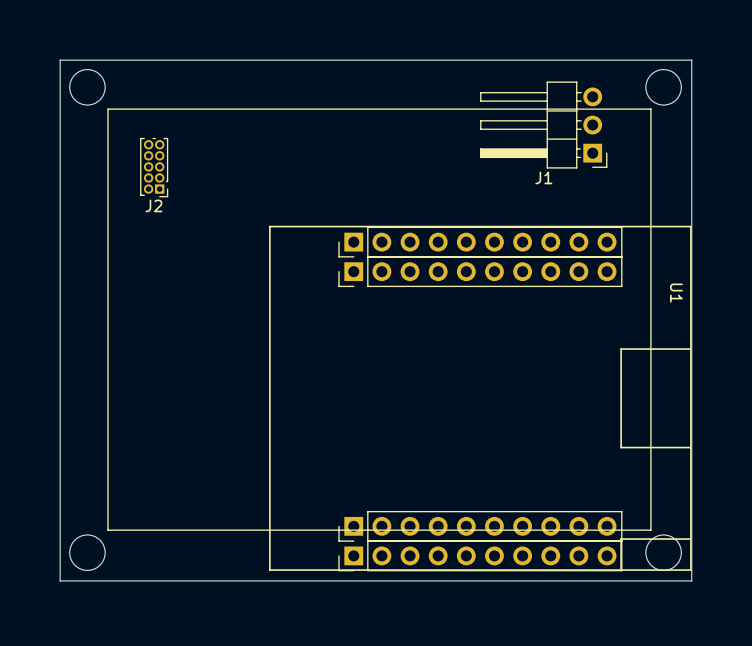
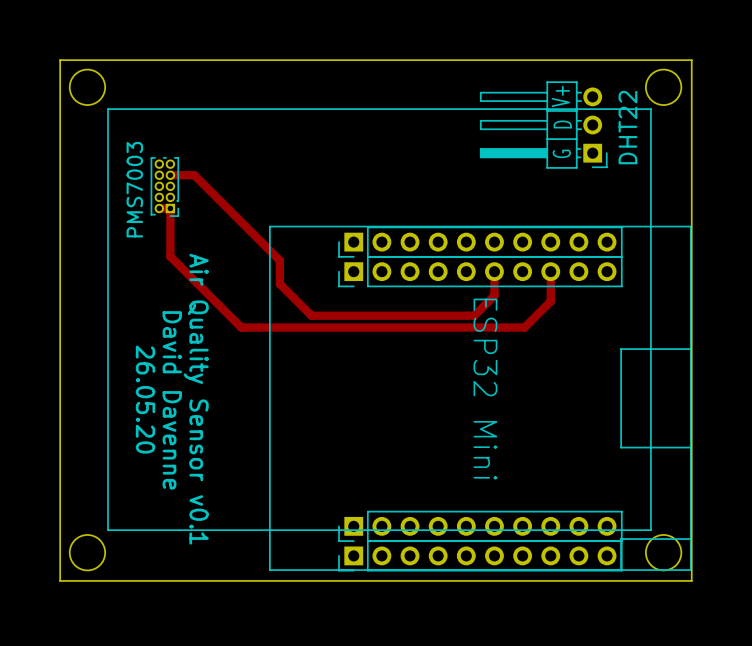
text: none -> V+ (560, 96)
text: none -> D (562, 124)
text: none -> G (561, 153)
J2: (154, 167) -> none
track: none -> (170, 175) (194, 175) (279, 260) (279, 284) (311, 315) (474, 315) (494, 295) (494, 271)
J1 name: J1 (543, 177) -> DHT22 (627, 127)
PMS7003: none -> (164, 187)
track: none -> (159, 208) (170, 208) (170, 256) (241, 327) (524, 327) (550, 301) (550, 271)
U1 name: U1 (676, 293) -> ESP32 Mini (485, 389)
text: none -> 26.05.20 (145, 399)
text: none -> Air Quality Sensor v0.1 (196, 399)
text: none -> David Davenne (172, 400)

